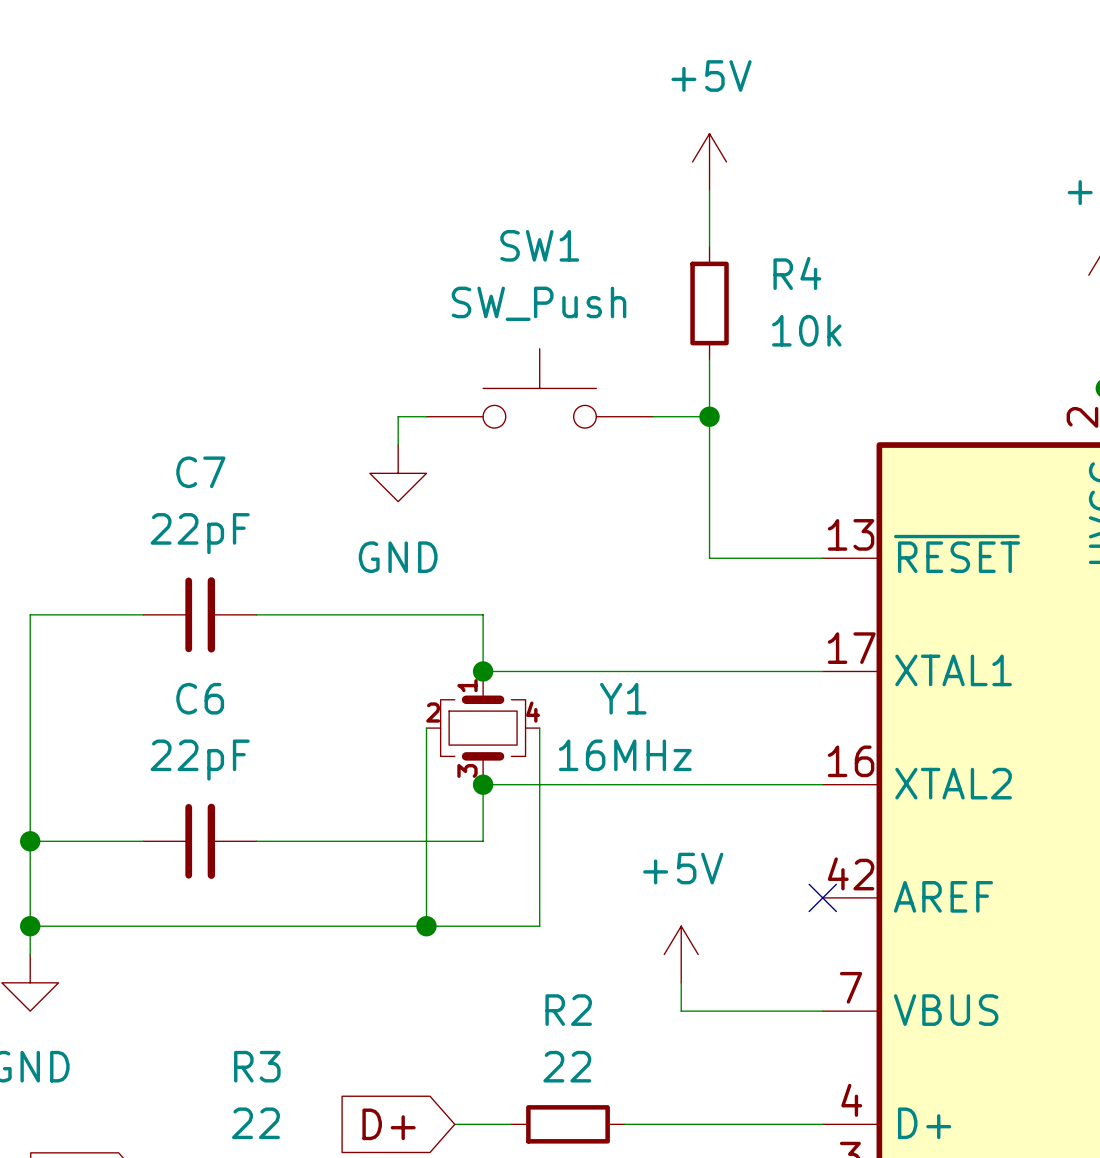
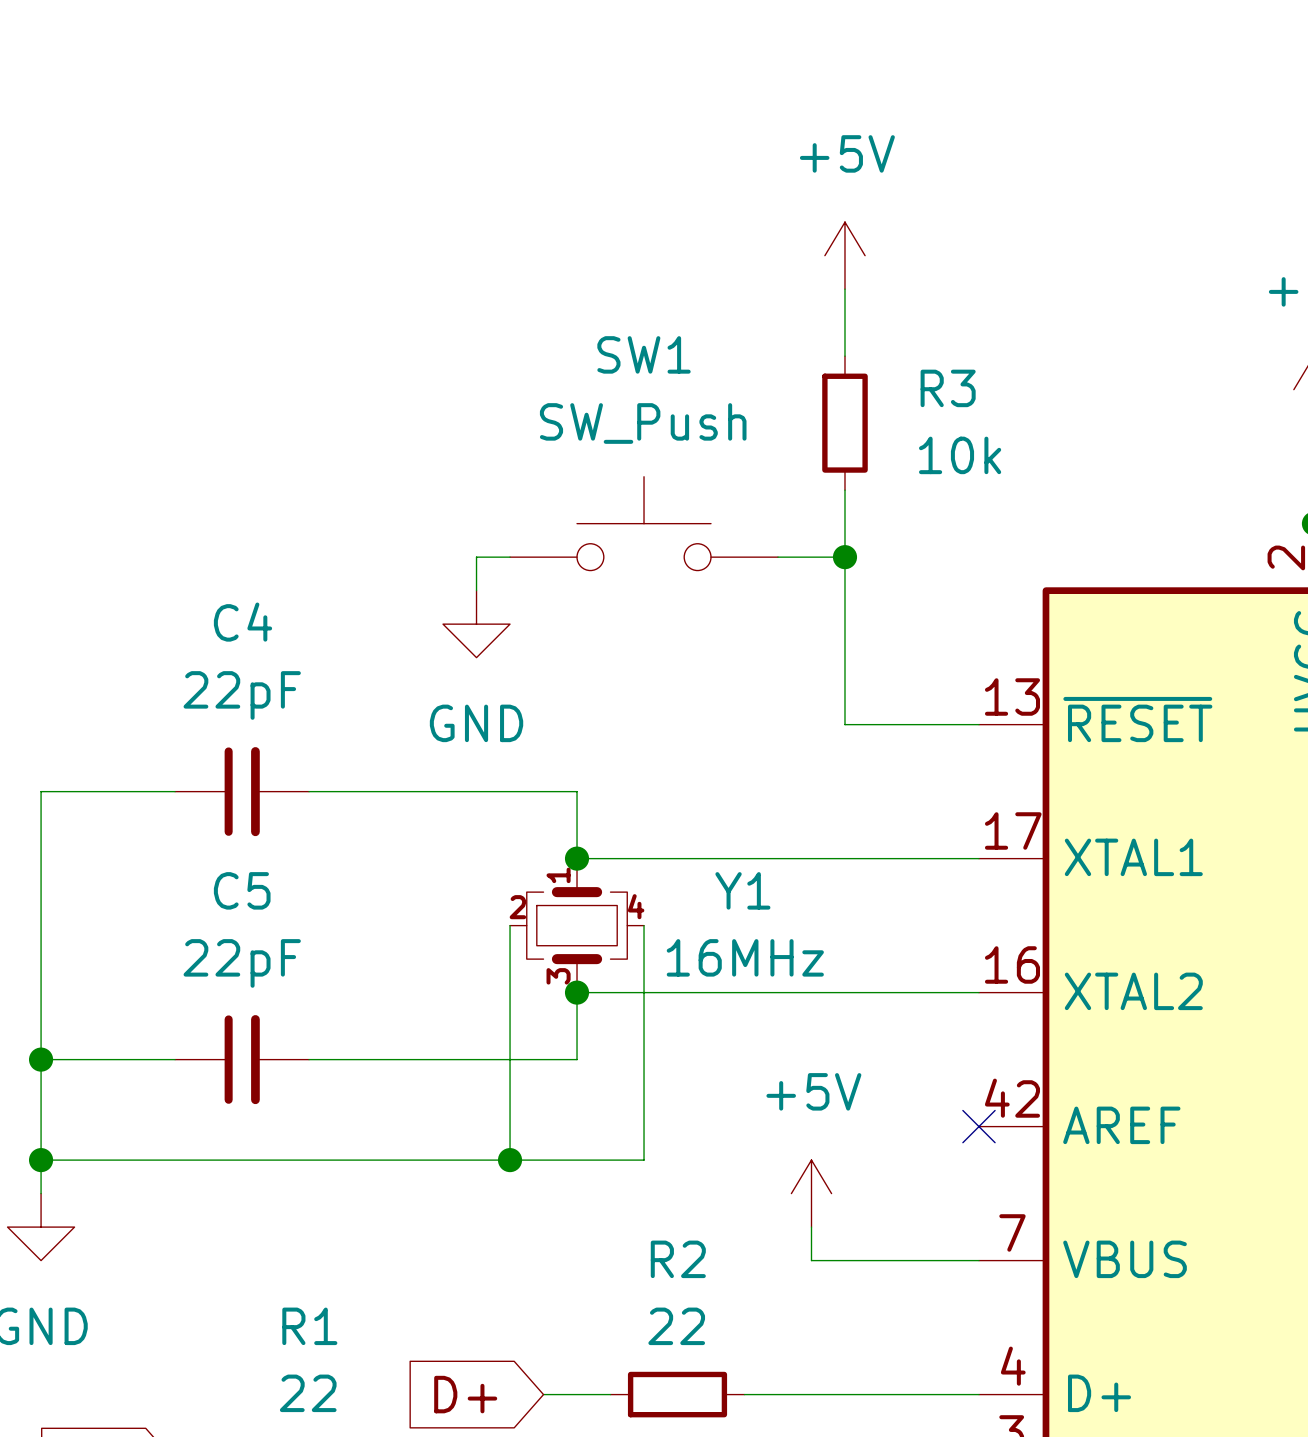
R4 name: R4 (797, 273) -> R3 (948, 388)
C7 name: C7 (200, 472) -> C4 (243, 622)
C6 name: C6 (200, 698) -> C5 (242, 890)
R3 name: R3 (257, 1066) -> R1 (309, 1326)

